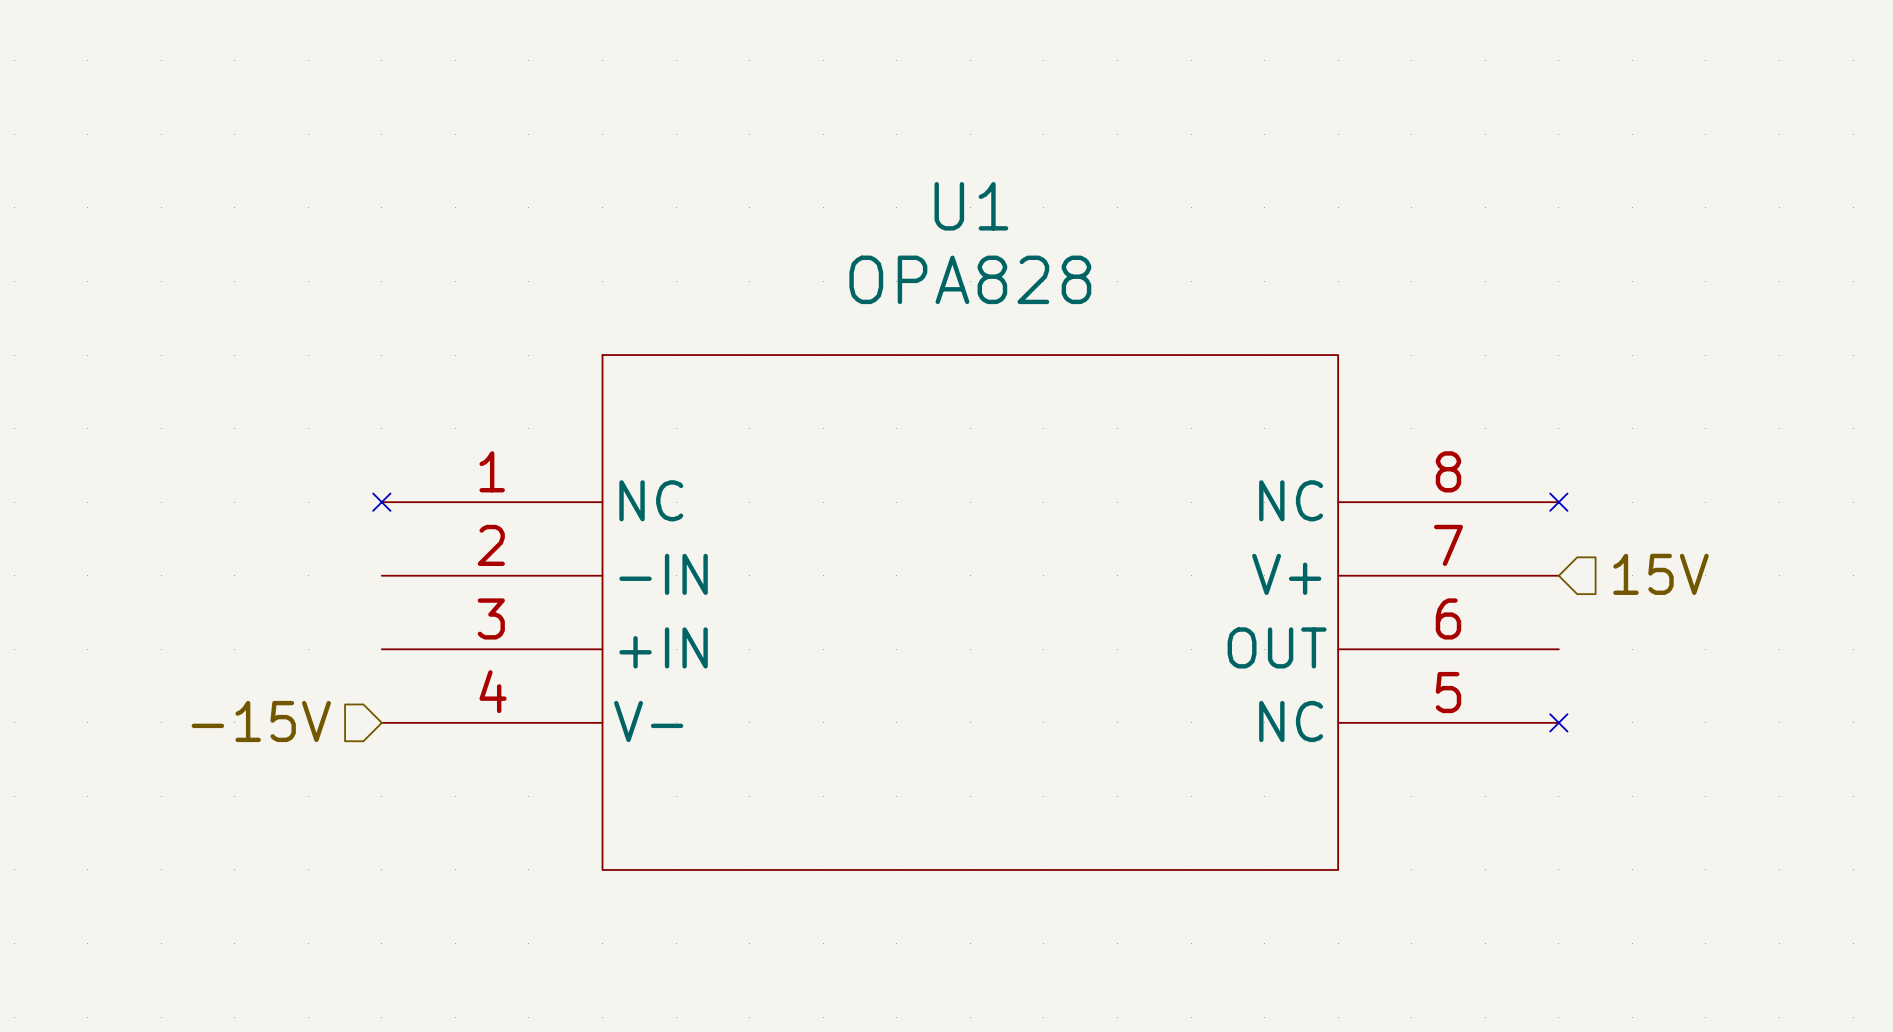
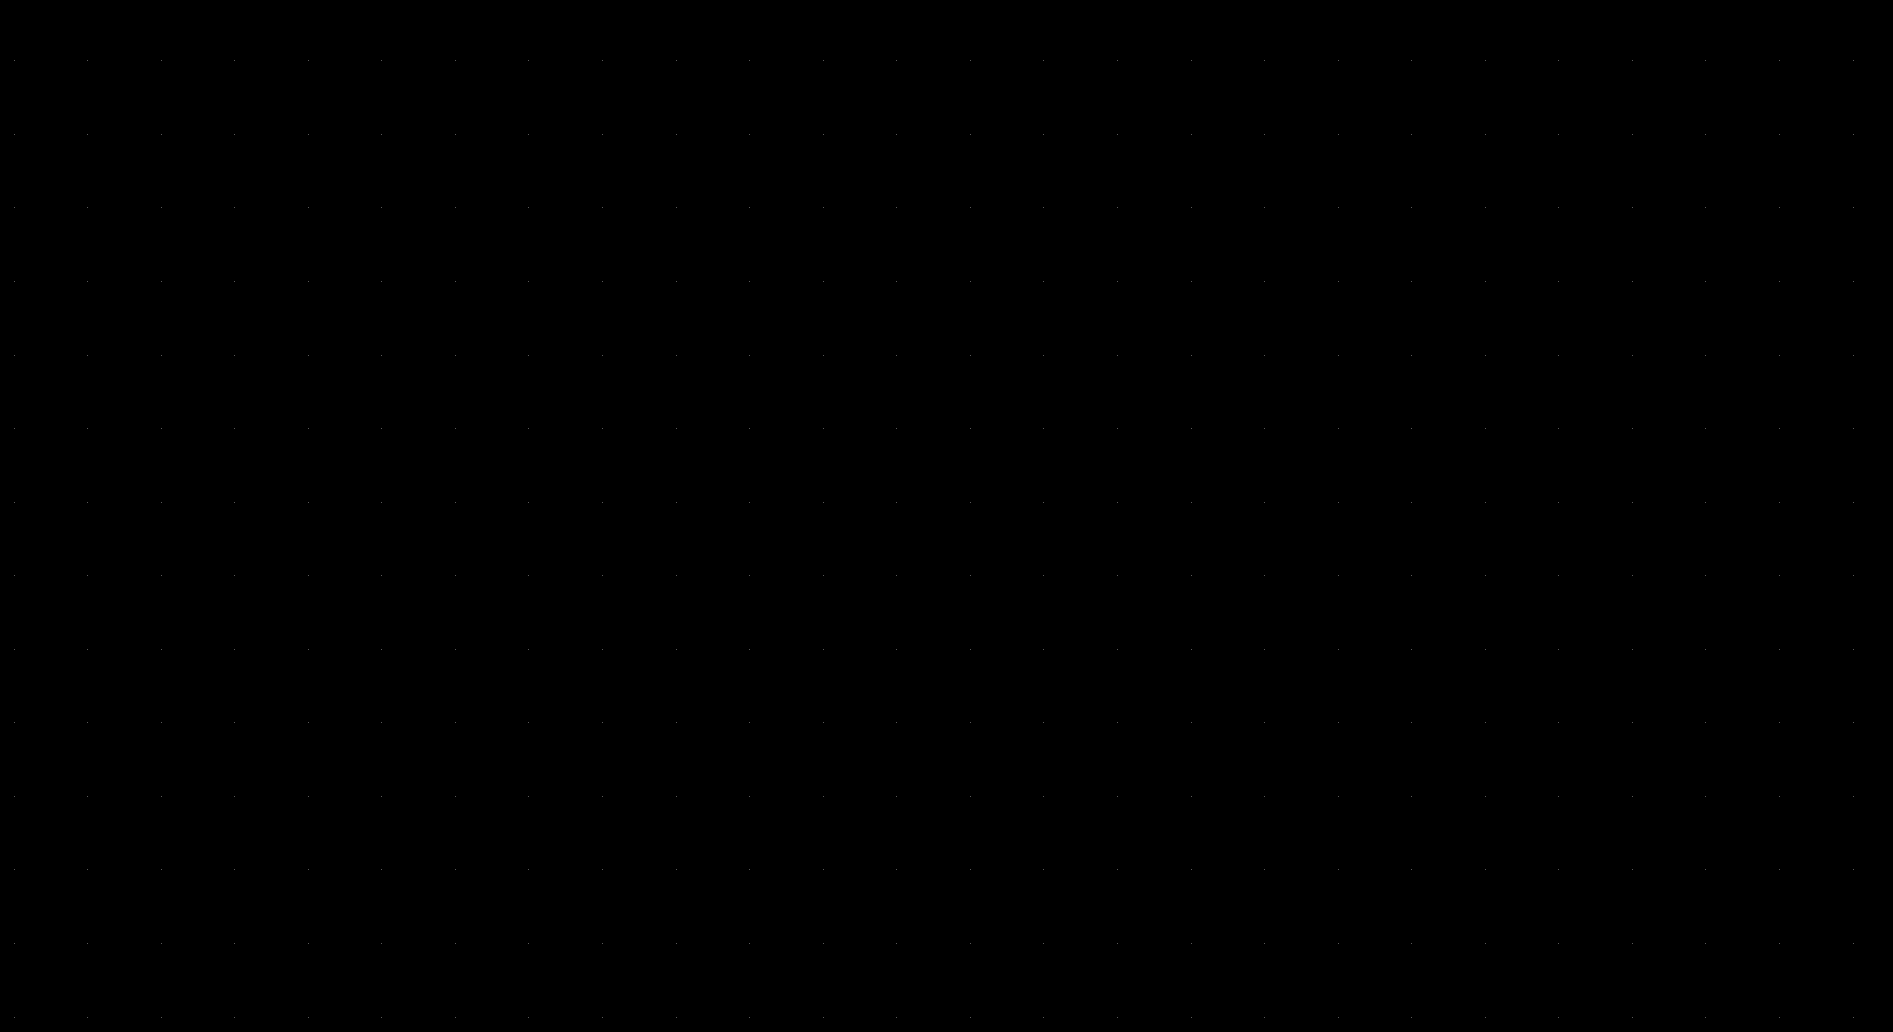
hierarchical label: 15V (1660, 574) -> none
U1: OPA828 (970, 612) -> none
hierarchical label: -15V (261, 721) -> none

